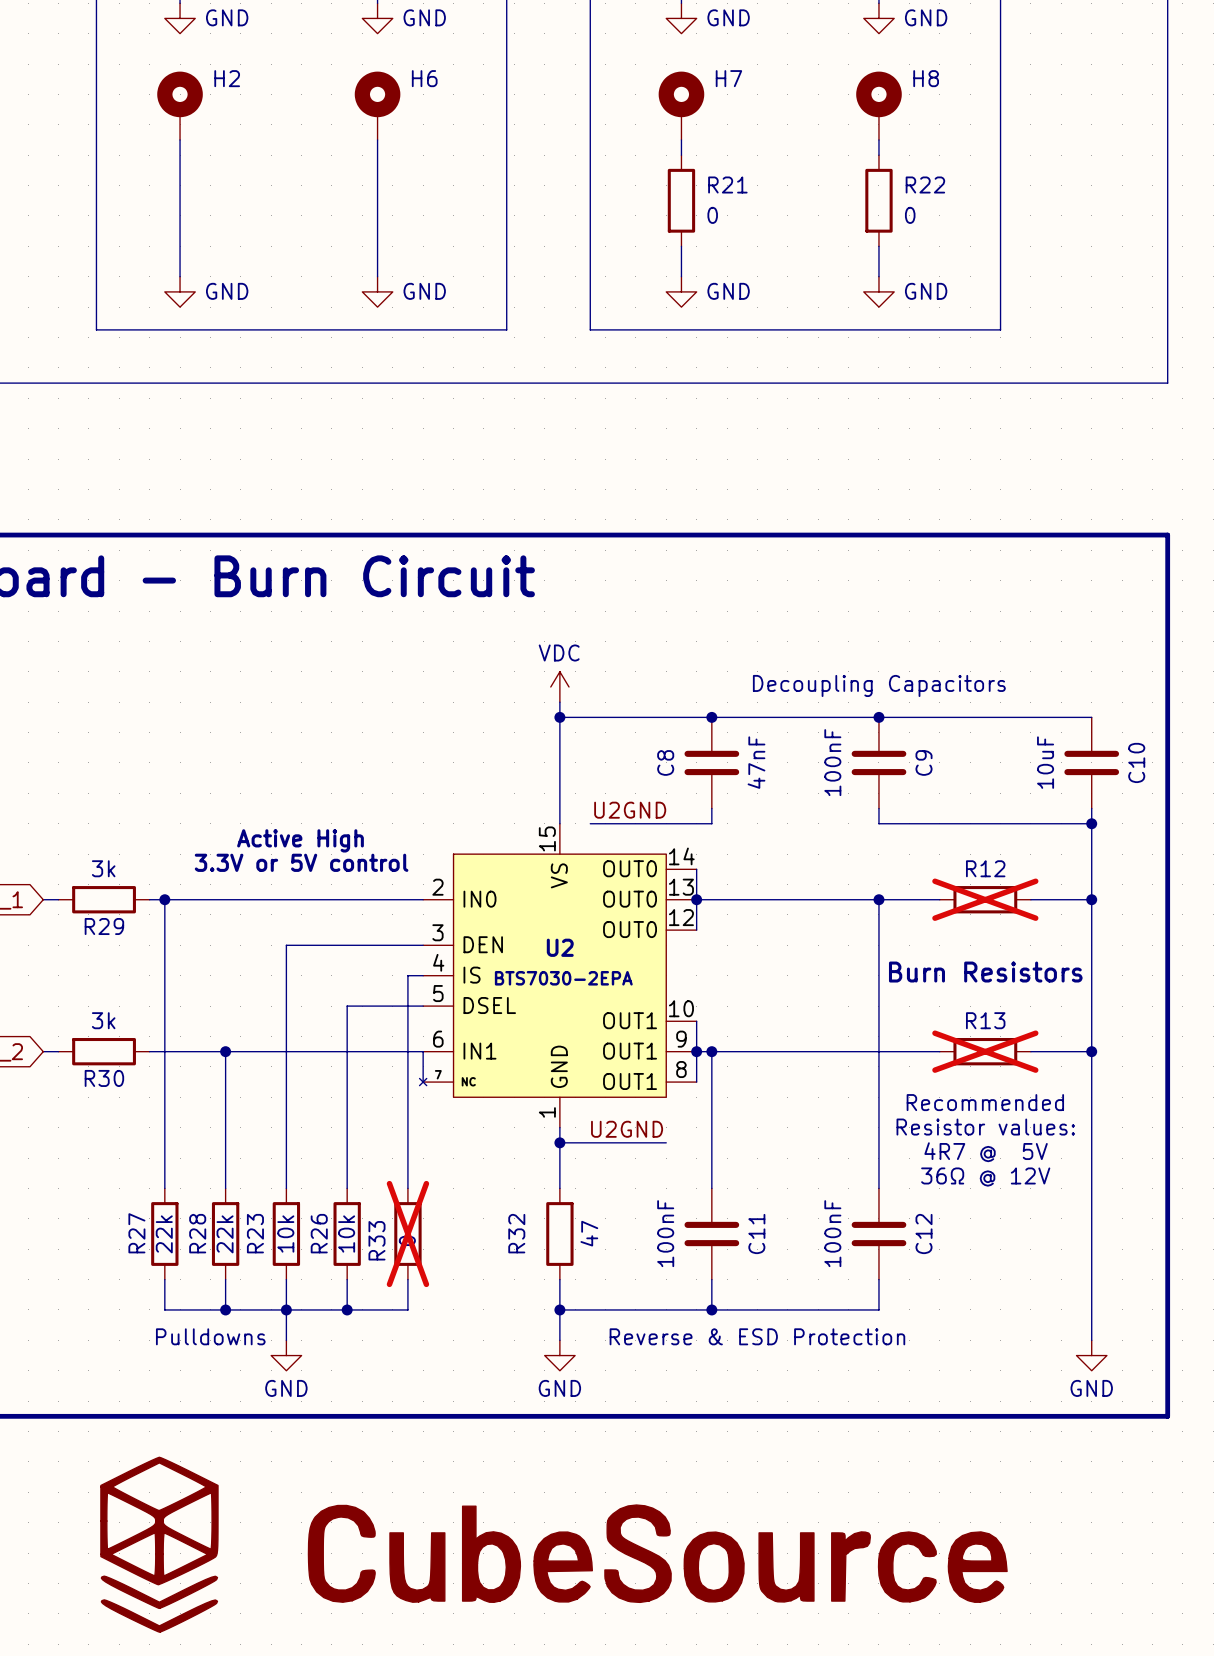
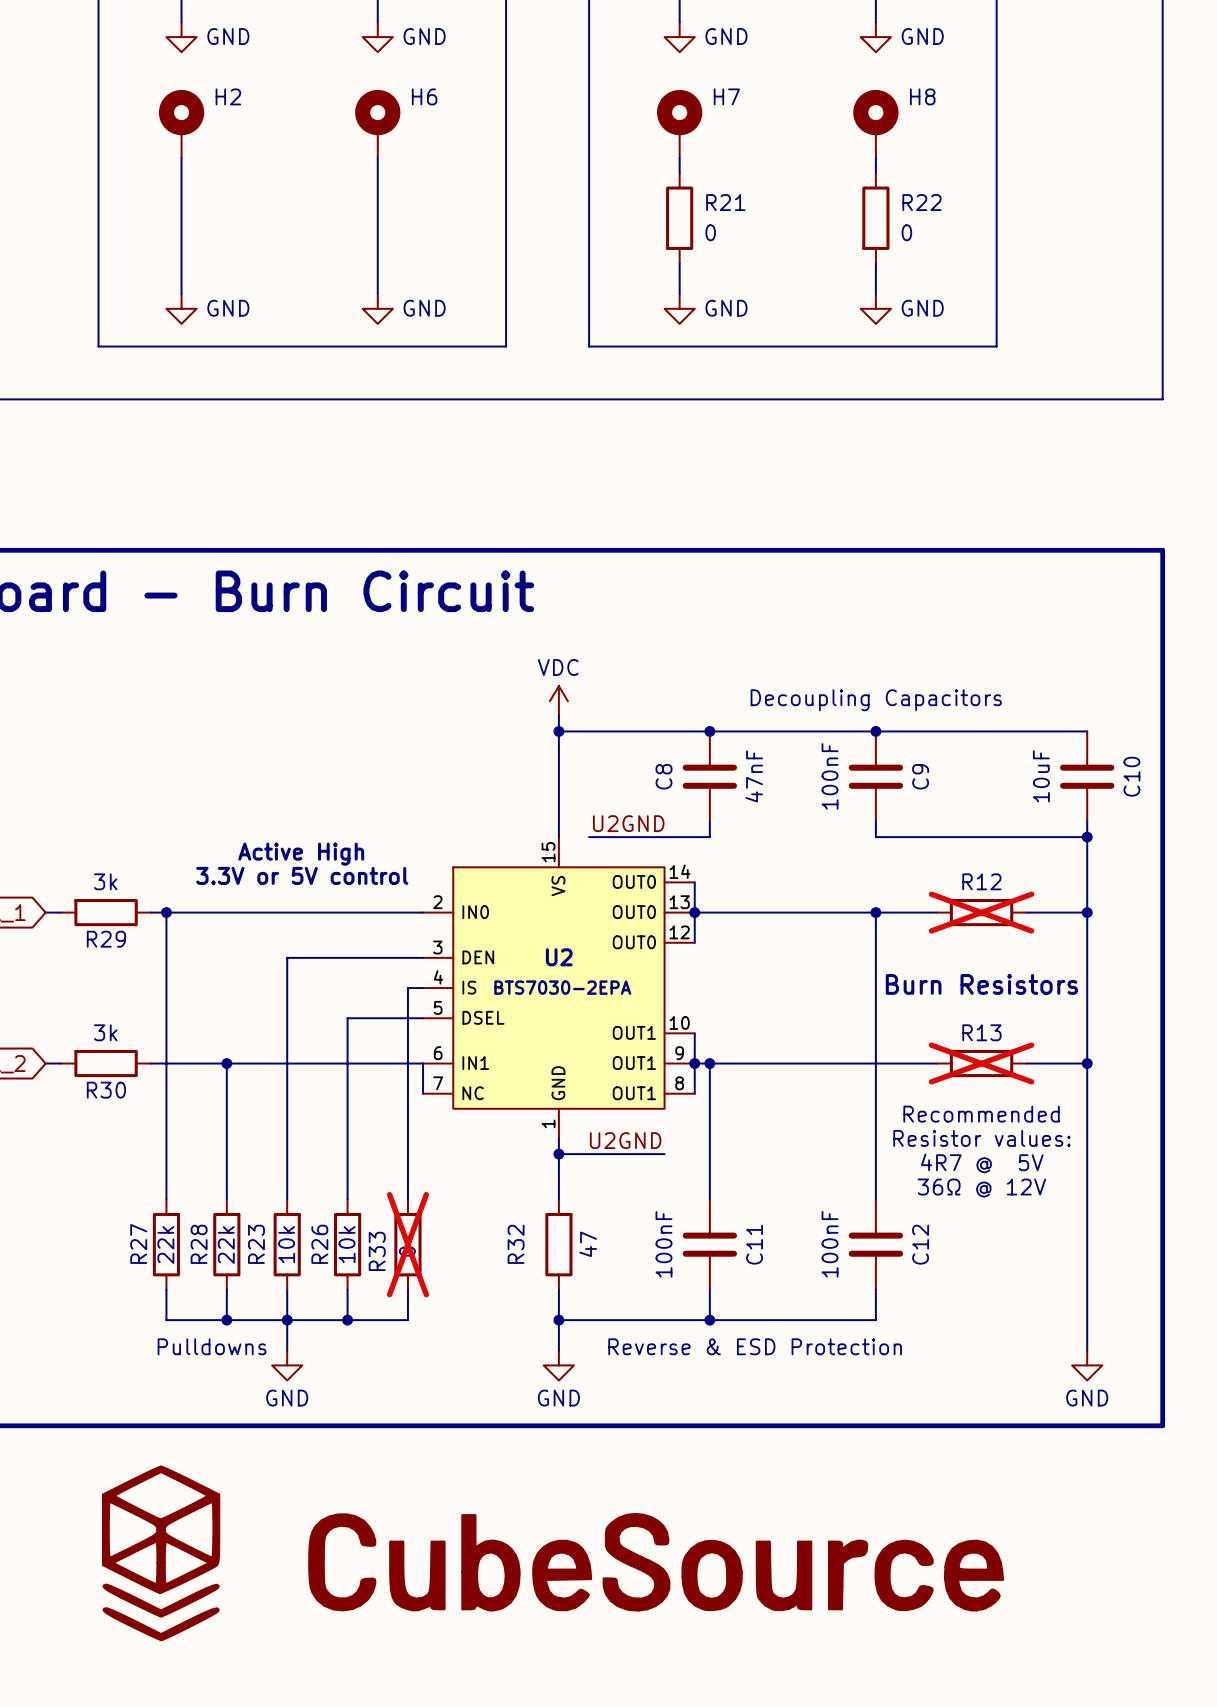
U2 symbol: [419, 823, 697, 1128] -> [423, 837, 695, 1140]

